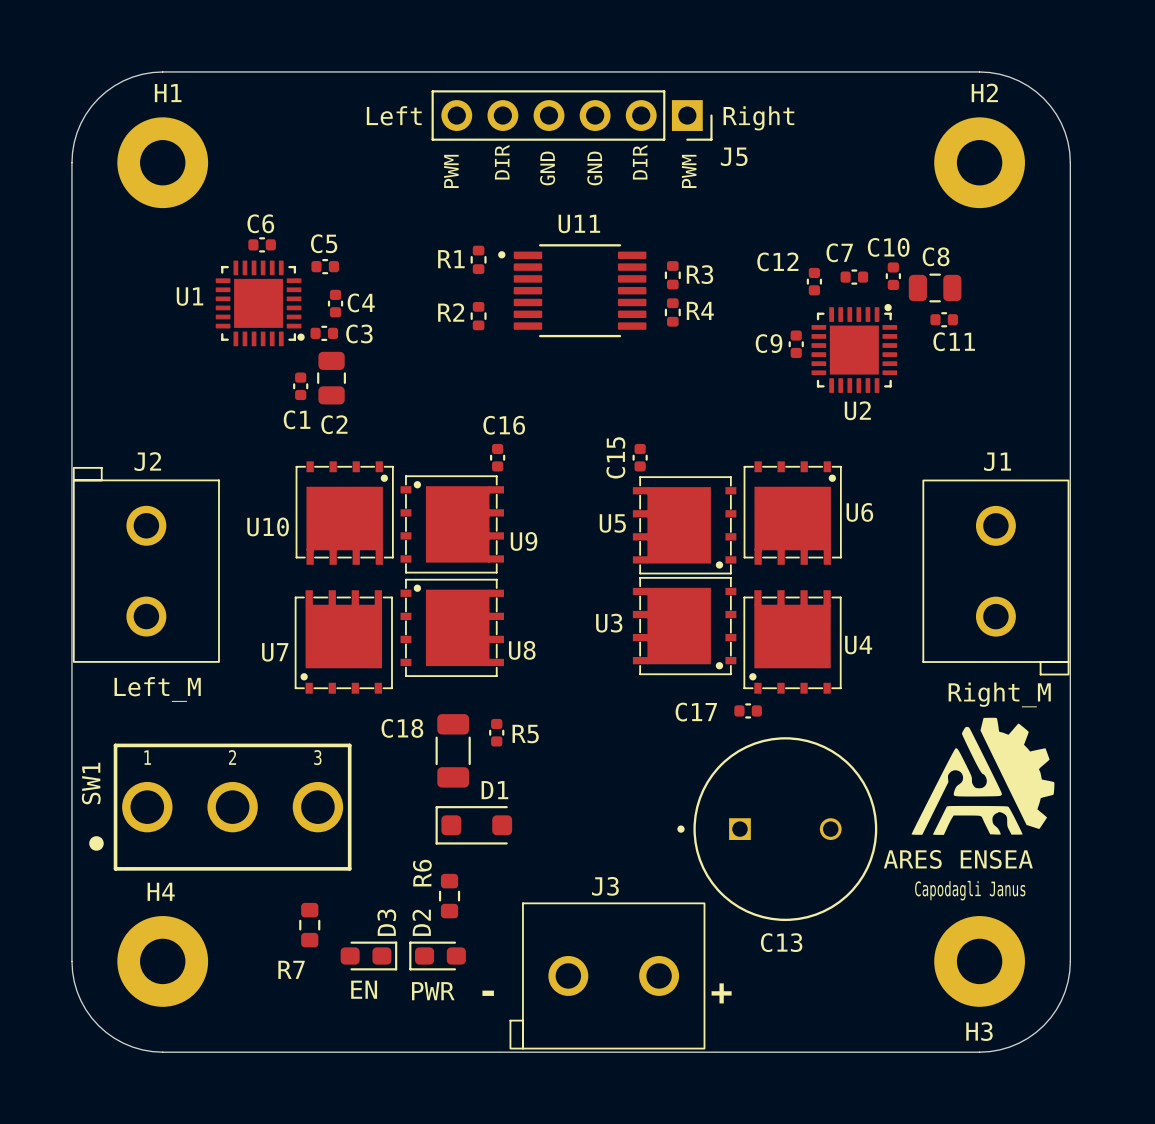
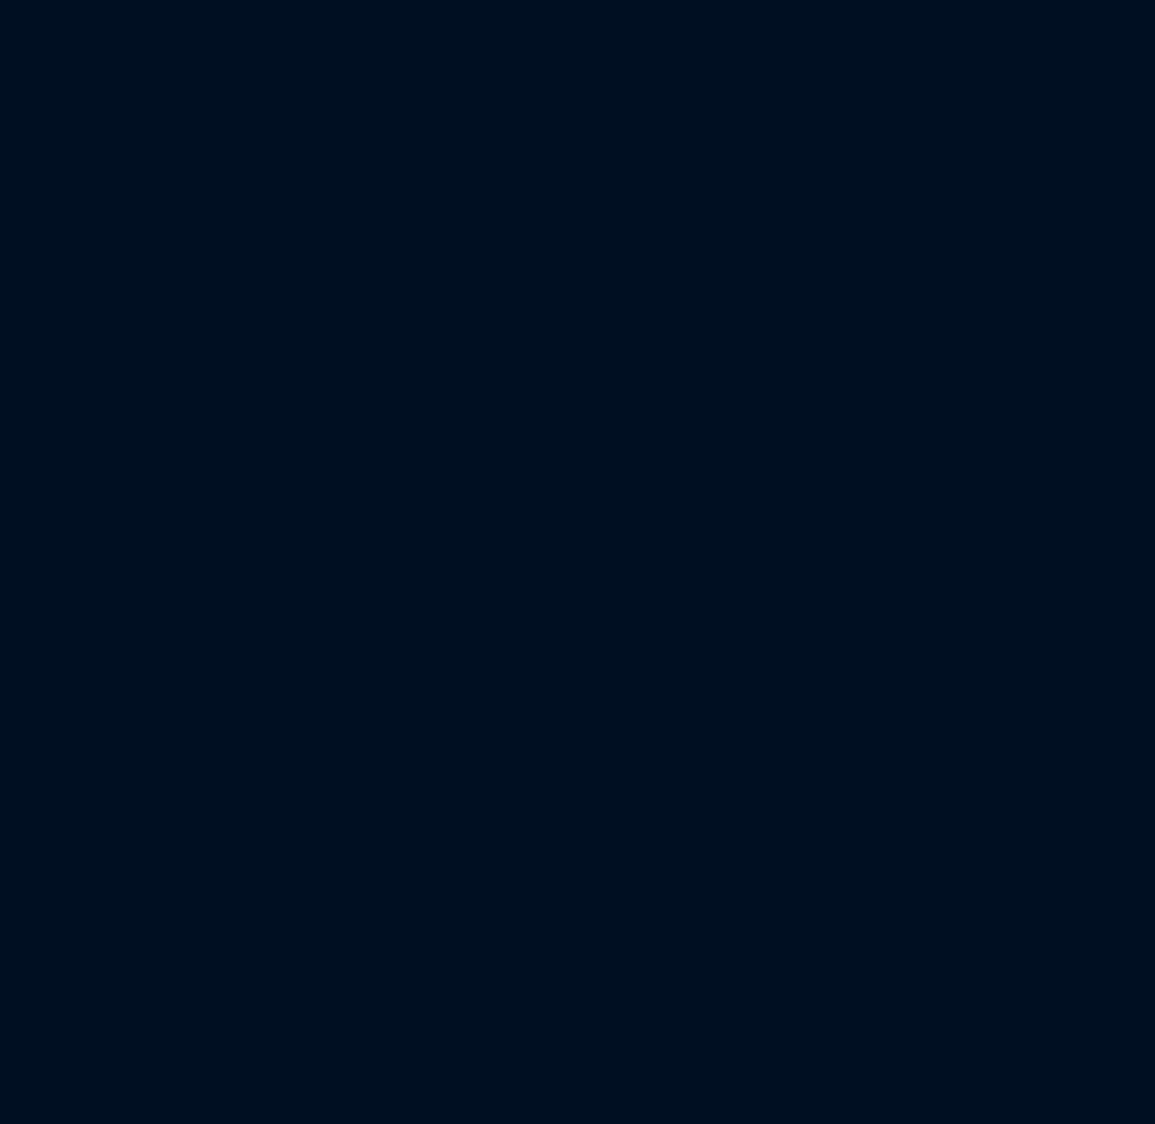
board edge: (162, 71) (979, 71) (999, 74) (1018, 80) (1043, 98) (1061, 123) (1068, 142) (1070, 162) (1070, 961) (1068, 981) (1061, 1000) (1043, 1025) (1018, 1043) (999, 1049) (979, 1052) (162, 1052) (132, 1047) (114, 1038) (98, 1025) (80, 1000) (74, 981) (71, 961) (72, 152) (80, 123) (98, 98) (123, 80) (142, 74) (162, 71) -> none
text: Left (394, 115) -> none
J5: (572, 115) -> none
text: Right (758, 118) -> none
H1: (162, 162) -> none
text: DIR (502, 162) -> none
text: DIR (640, 162) -> none
H2: (979, 162) -> none
text: GND (547, 168) -> none
text: GND (594, 168) -> none
text: PWM (451, 171) -> none
text: PWM (689, 171) -> none
C6: (262, 244) -> none
R1: (478, 259) -> none
C5: (325, 266) -> none
R3: (672, 275) -> none
C10: (893, 276) -> none
C7: (854, 277) -> none
C12: (814, 281) -> none
C8: (935, 287) -> none
U11: (572, 290) -> none
U1: (260, 303) -> none
C4: (335, 303) -> none
R4: (672, 312) -> none
R2: (478, 316) -> none
C11: (944, 319) -> none
C3: (324, 333) -> none
C9: (796, 344) -> none
U2: (854, 348) -> none
C2: (331, 378) -> none
C1: (300, 386) -> none
C16: (497, 457) -> none
C15: (640, 457) -> none
U10: (344, 513) -> none
U6: (792, 513) -> none
U9: (452, 524) -> none
U5: (684, 525) -> none
J2: (146, 564) -> none
J1: (995, 577) -> none
U3: (684, 626) -> none
U8: (452, 627) -> none
U7: (343, 641) -> none
U4: (792, 641) -> none
text: Left_M (157, 689) -> none
text: Right_M (999, 694) -> none
C17: (748, 710) -> none
drawing: [911, 717, 1055, 835] -> none
C18: (496, 732) -> none
R5: (453, 750) -> none
SW1: (220, 807) -> none
D1: (473, 825) -> none
C13: (777, 829) -> none
text: ARES ENSEA (958, 859) -> none
text: Capodagli Janus (970, 890) -> none
R6: (449, 896) -> none
R7: (309, 925) -> none
D3: (368, 955) -> none
D2: (437, 955) -> none
H4: (162, 961) -> none
H3: (979, 961) -> none
J3: (607, 975) -> none
text: EN (364, 989) -> none
text: PWR (433, 991) -> none
text: - (488, 993) -> none
text: + (721, 993) -> none

